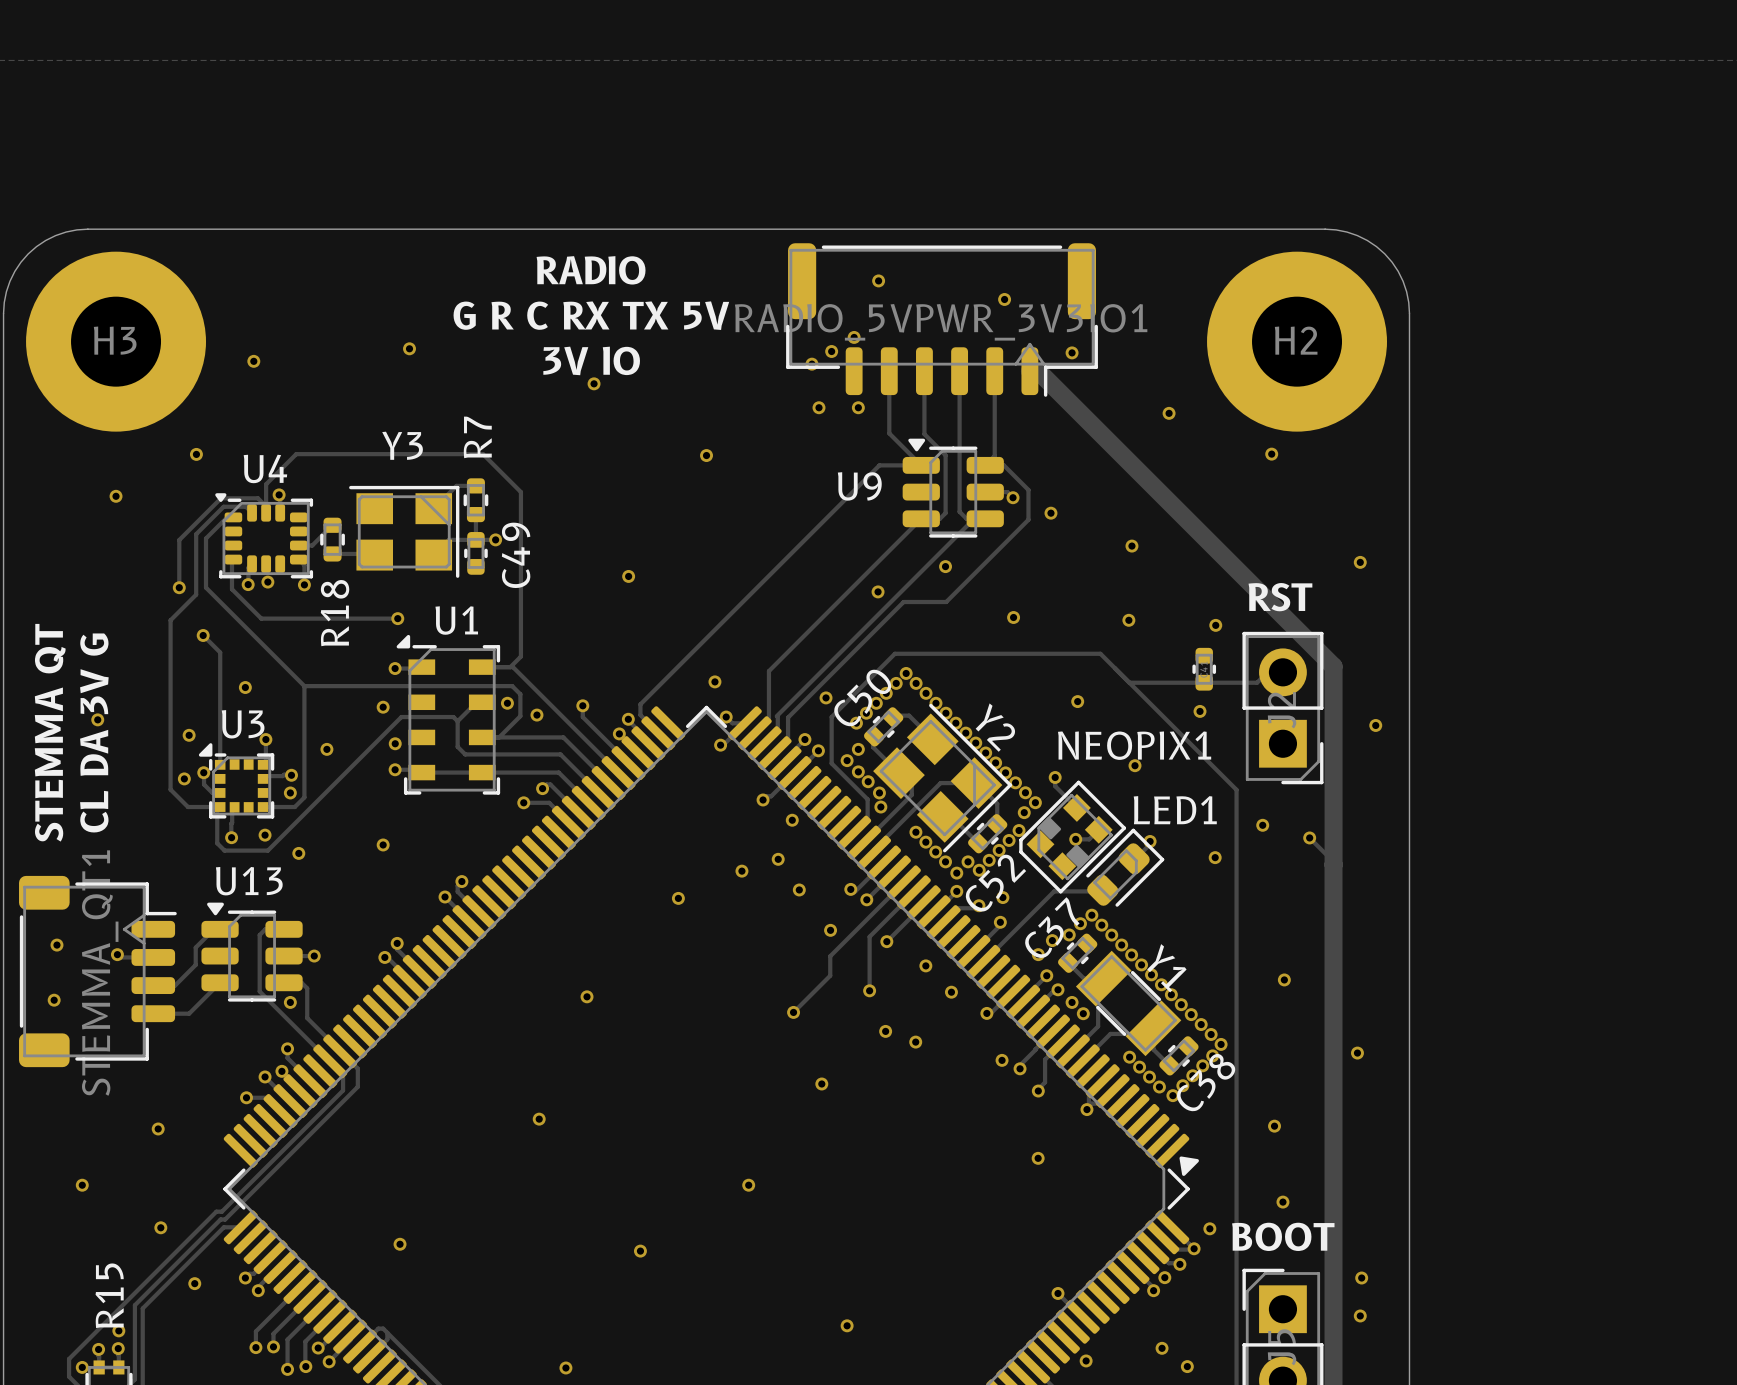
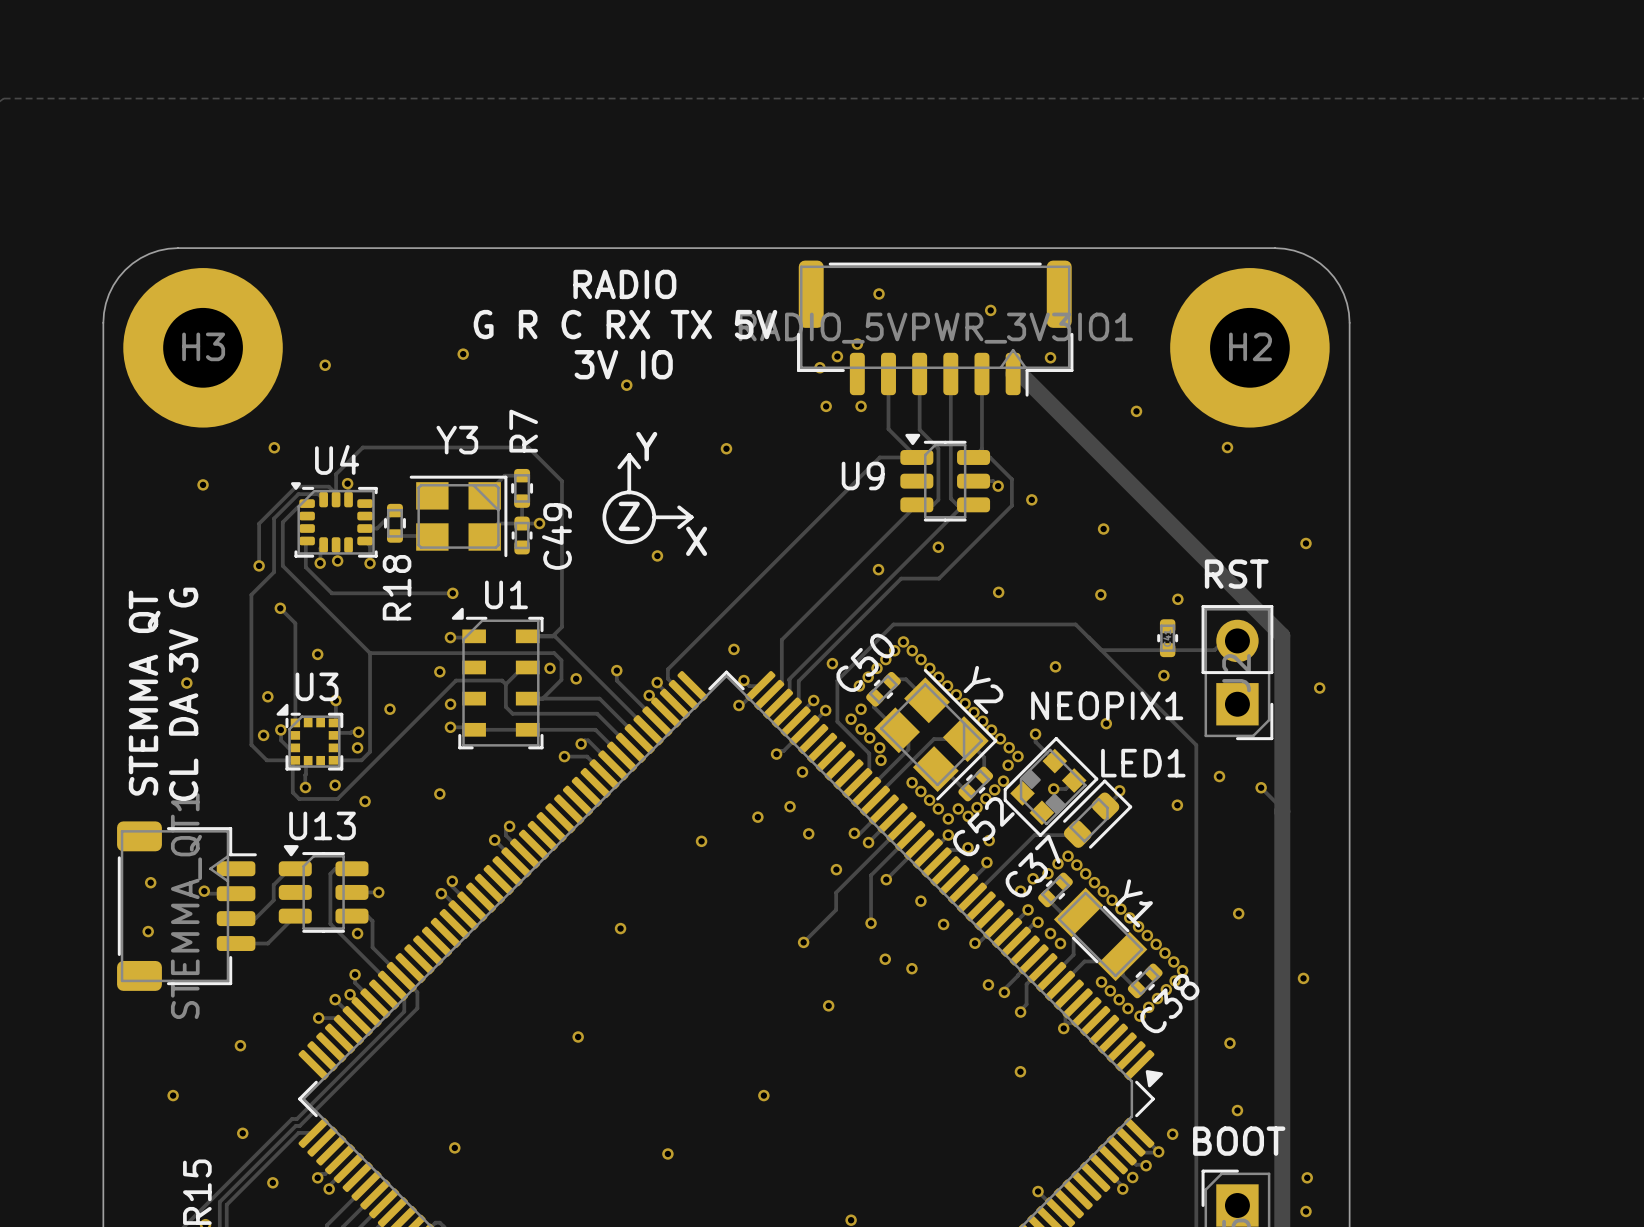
drawing: none -> [602, 453, 694, 545]

